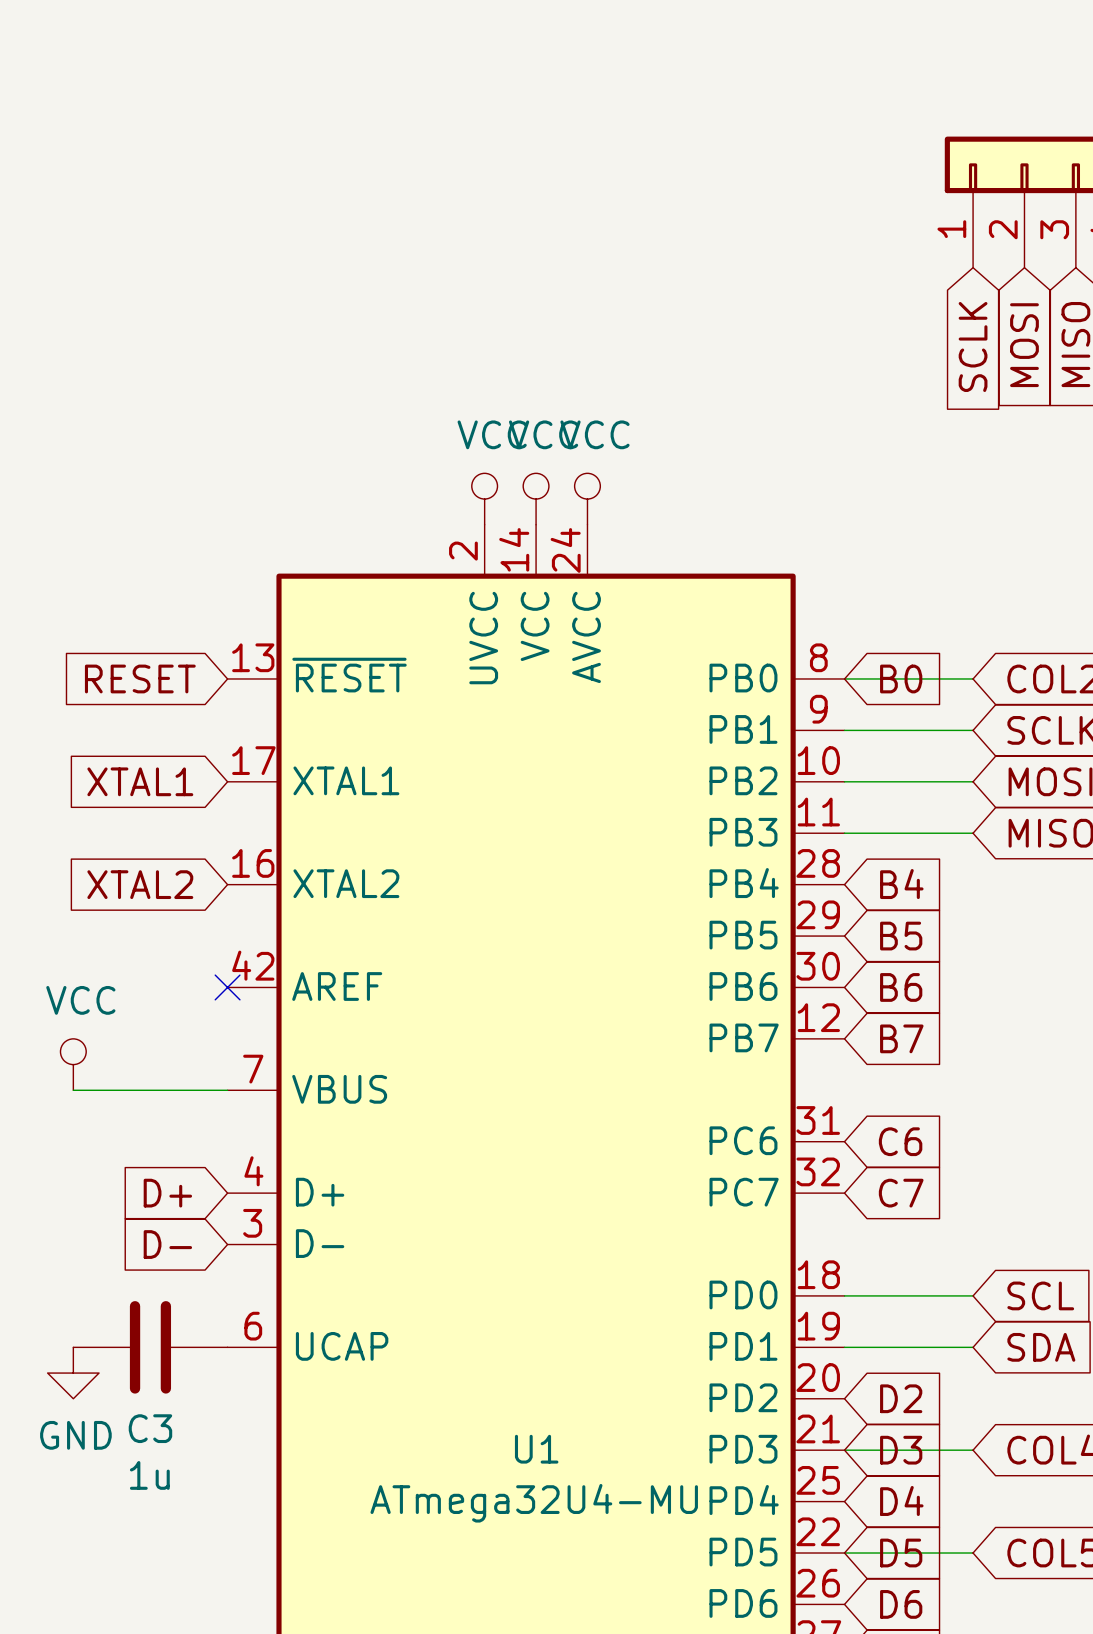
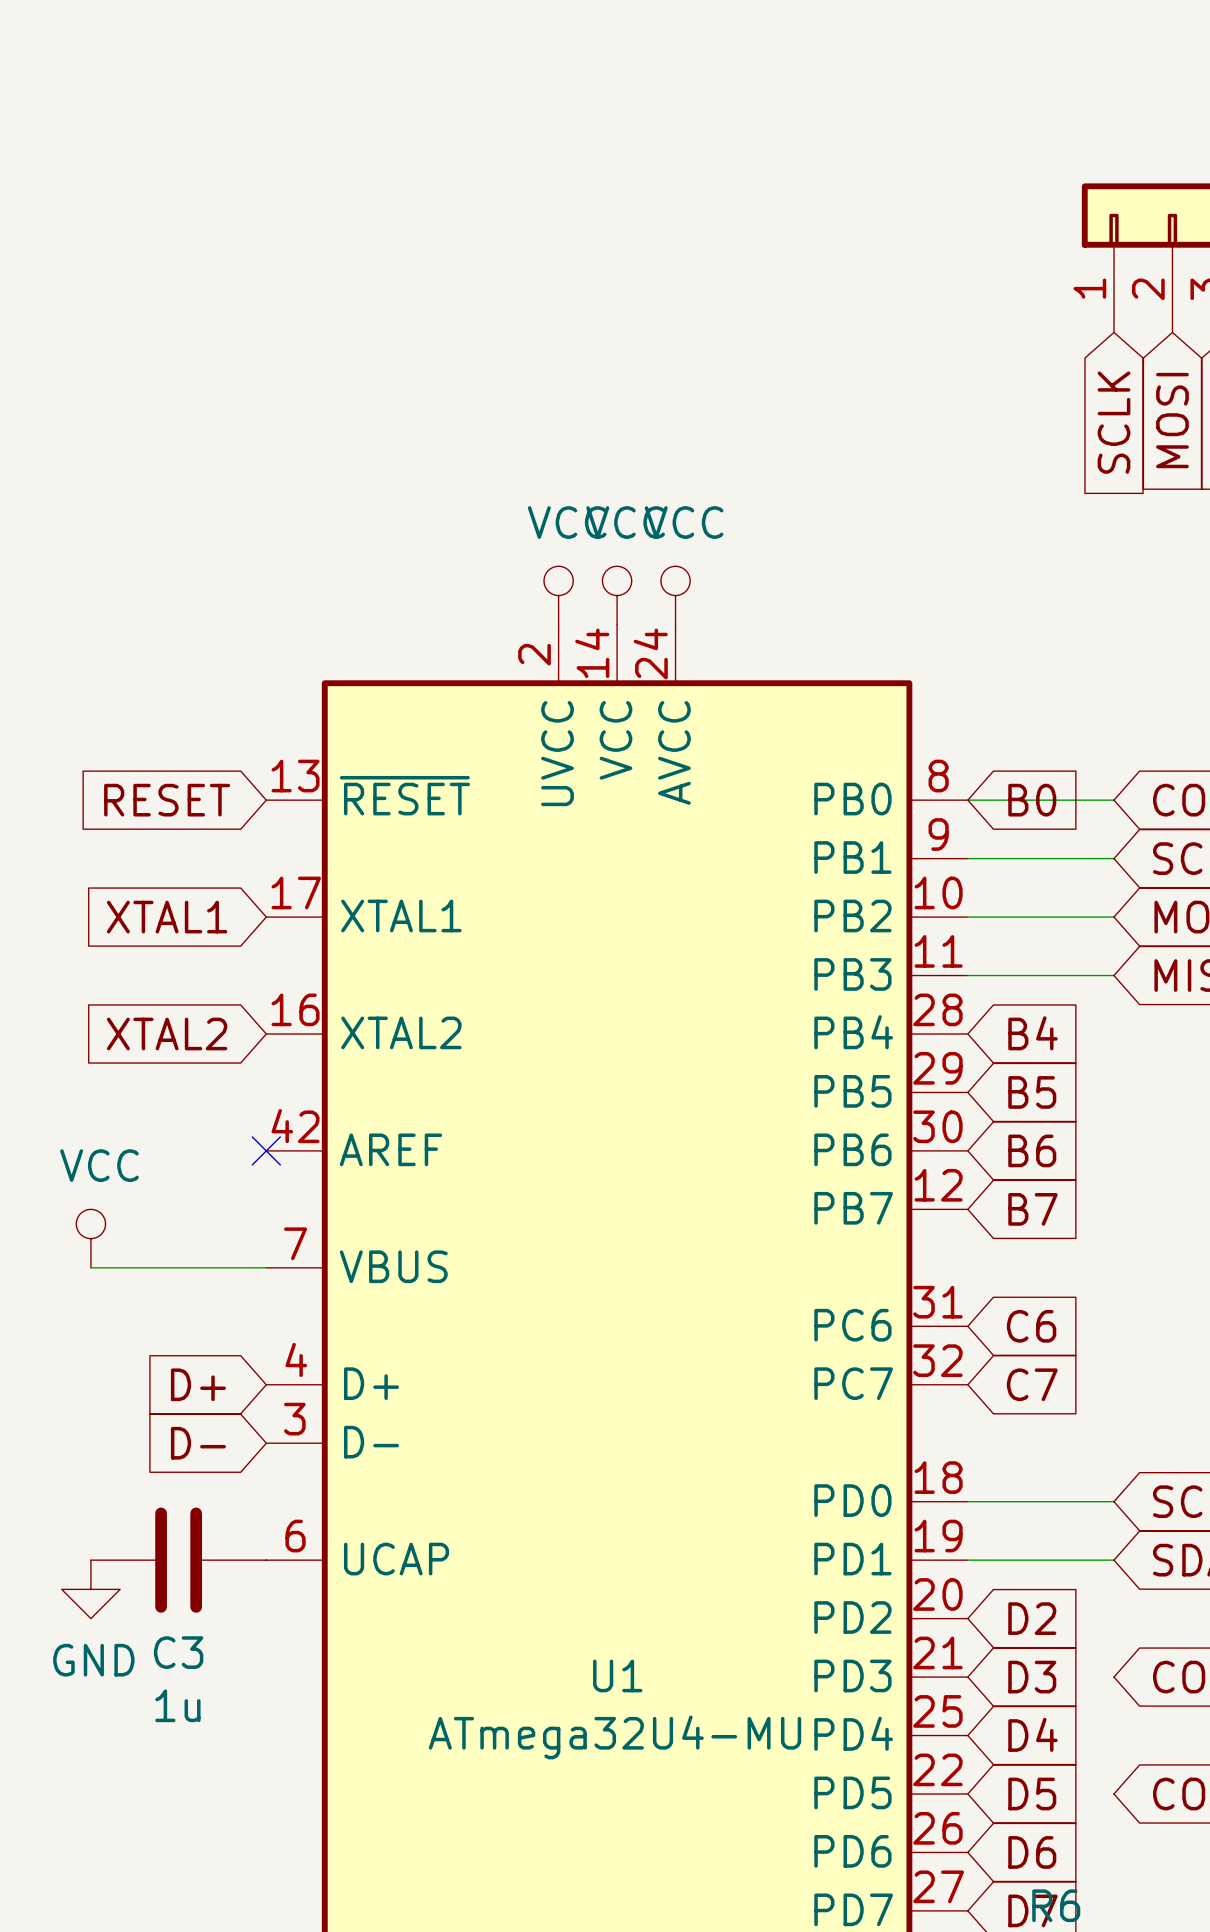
wire: (844, 1450) (973, 1450) -> none
wire: (844, 1553) (973, 1553) -> none

